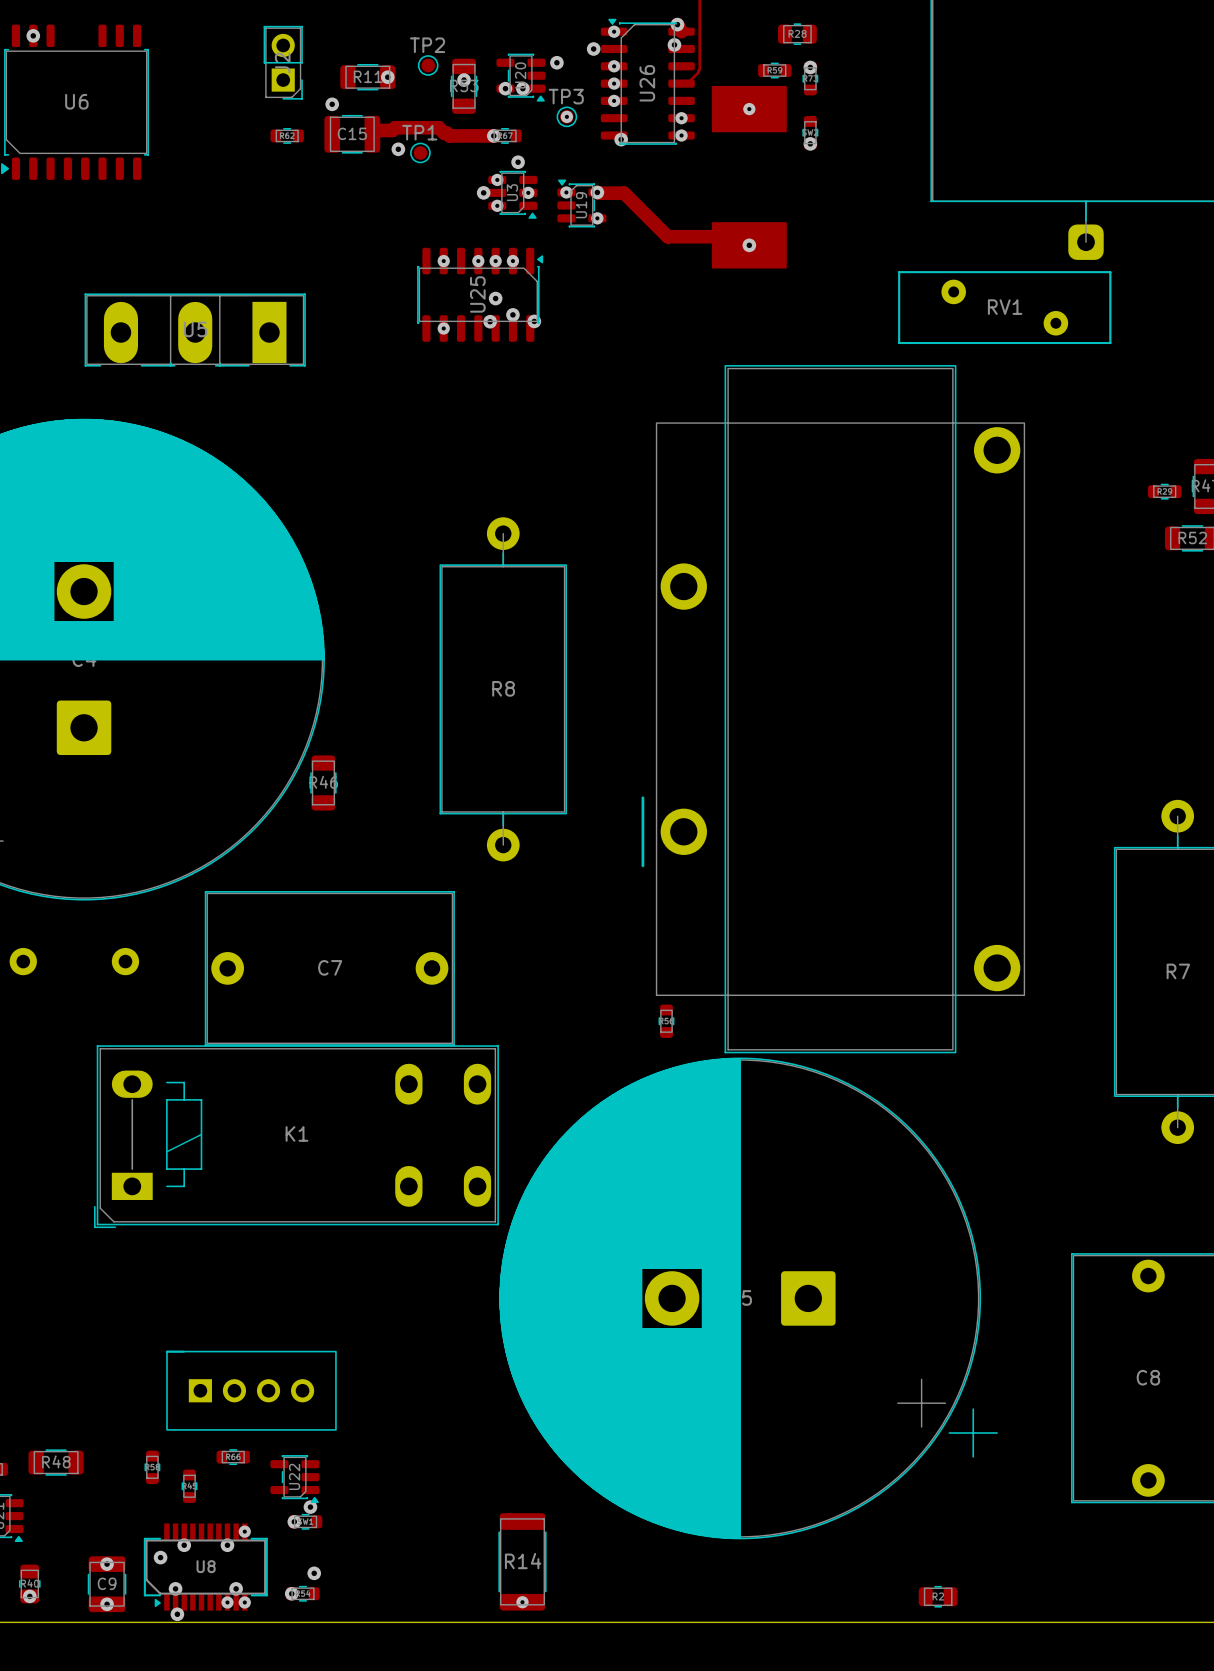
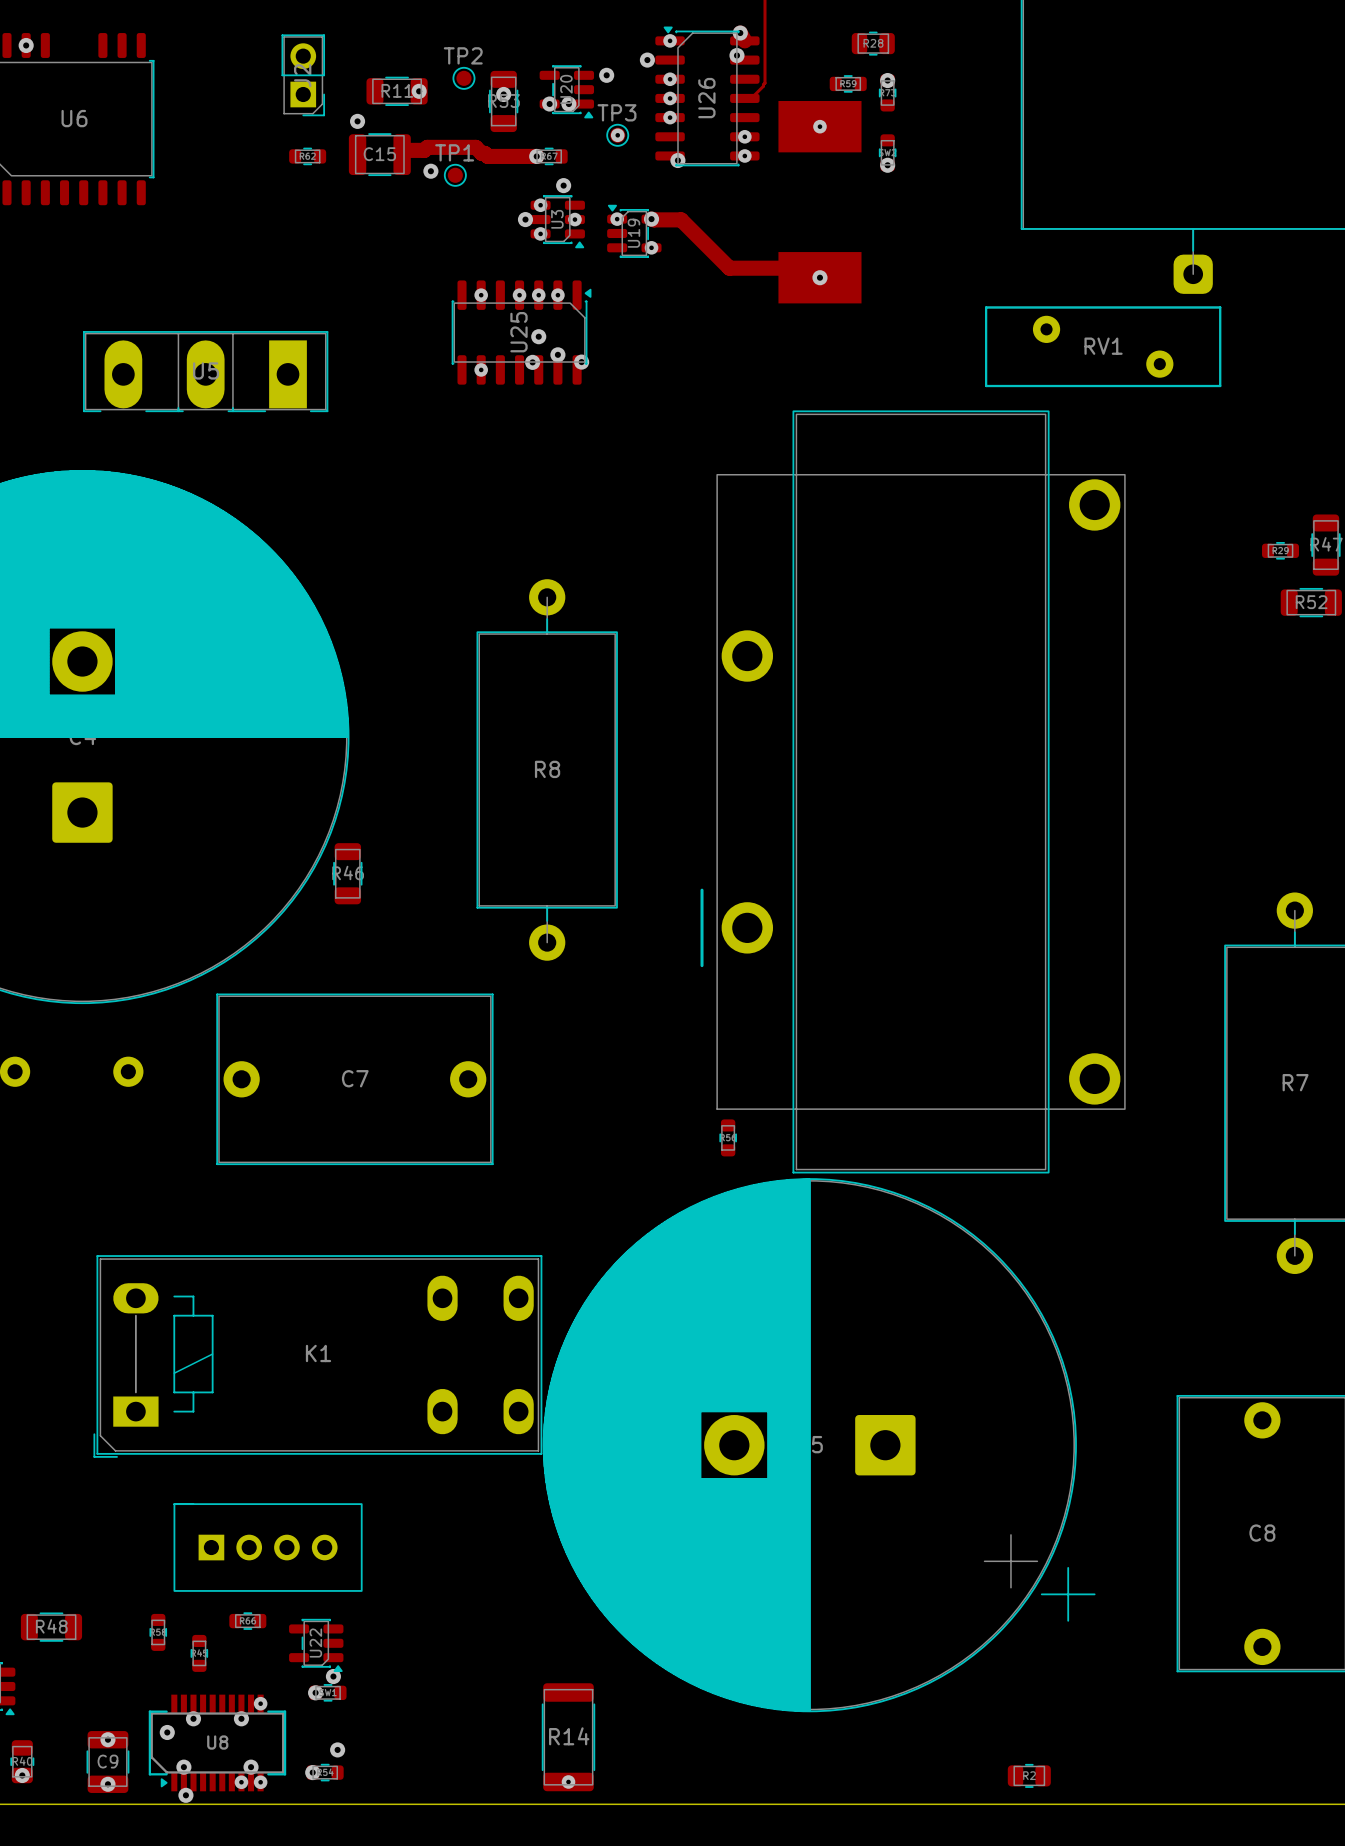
K1 position: (296, 1136) -> (317, 1356)

